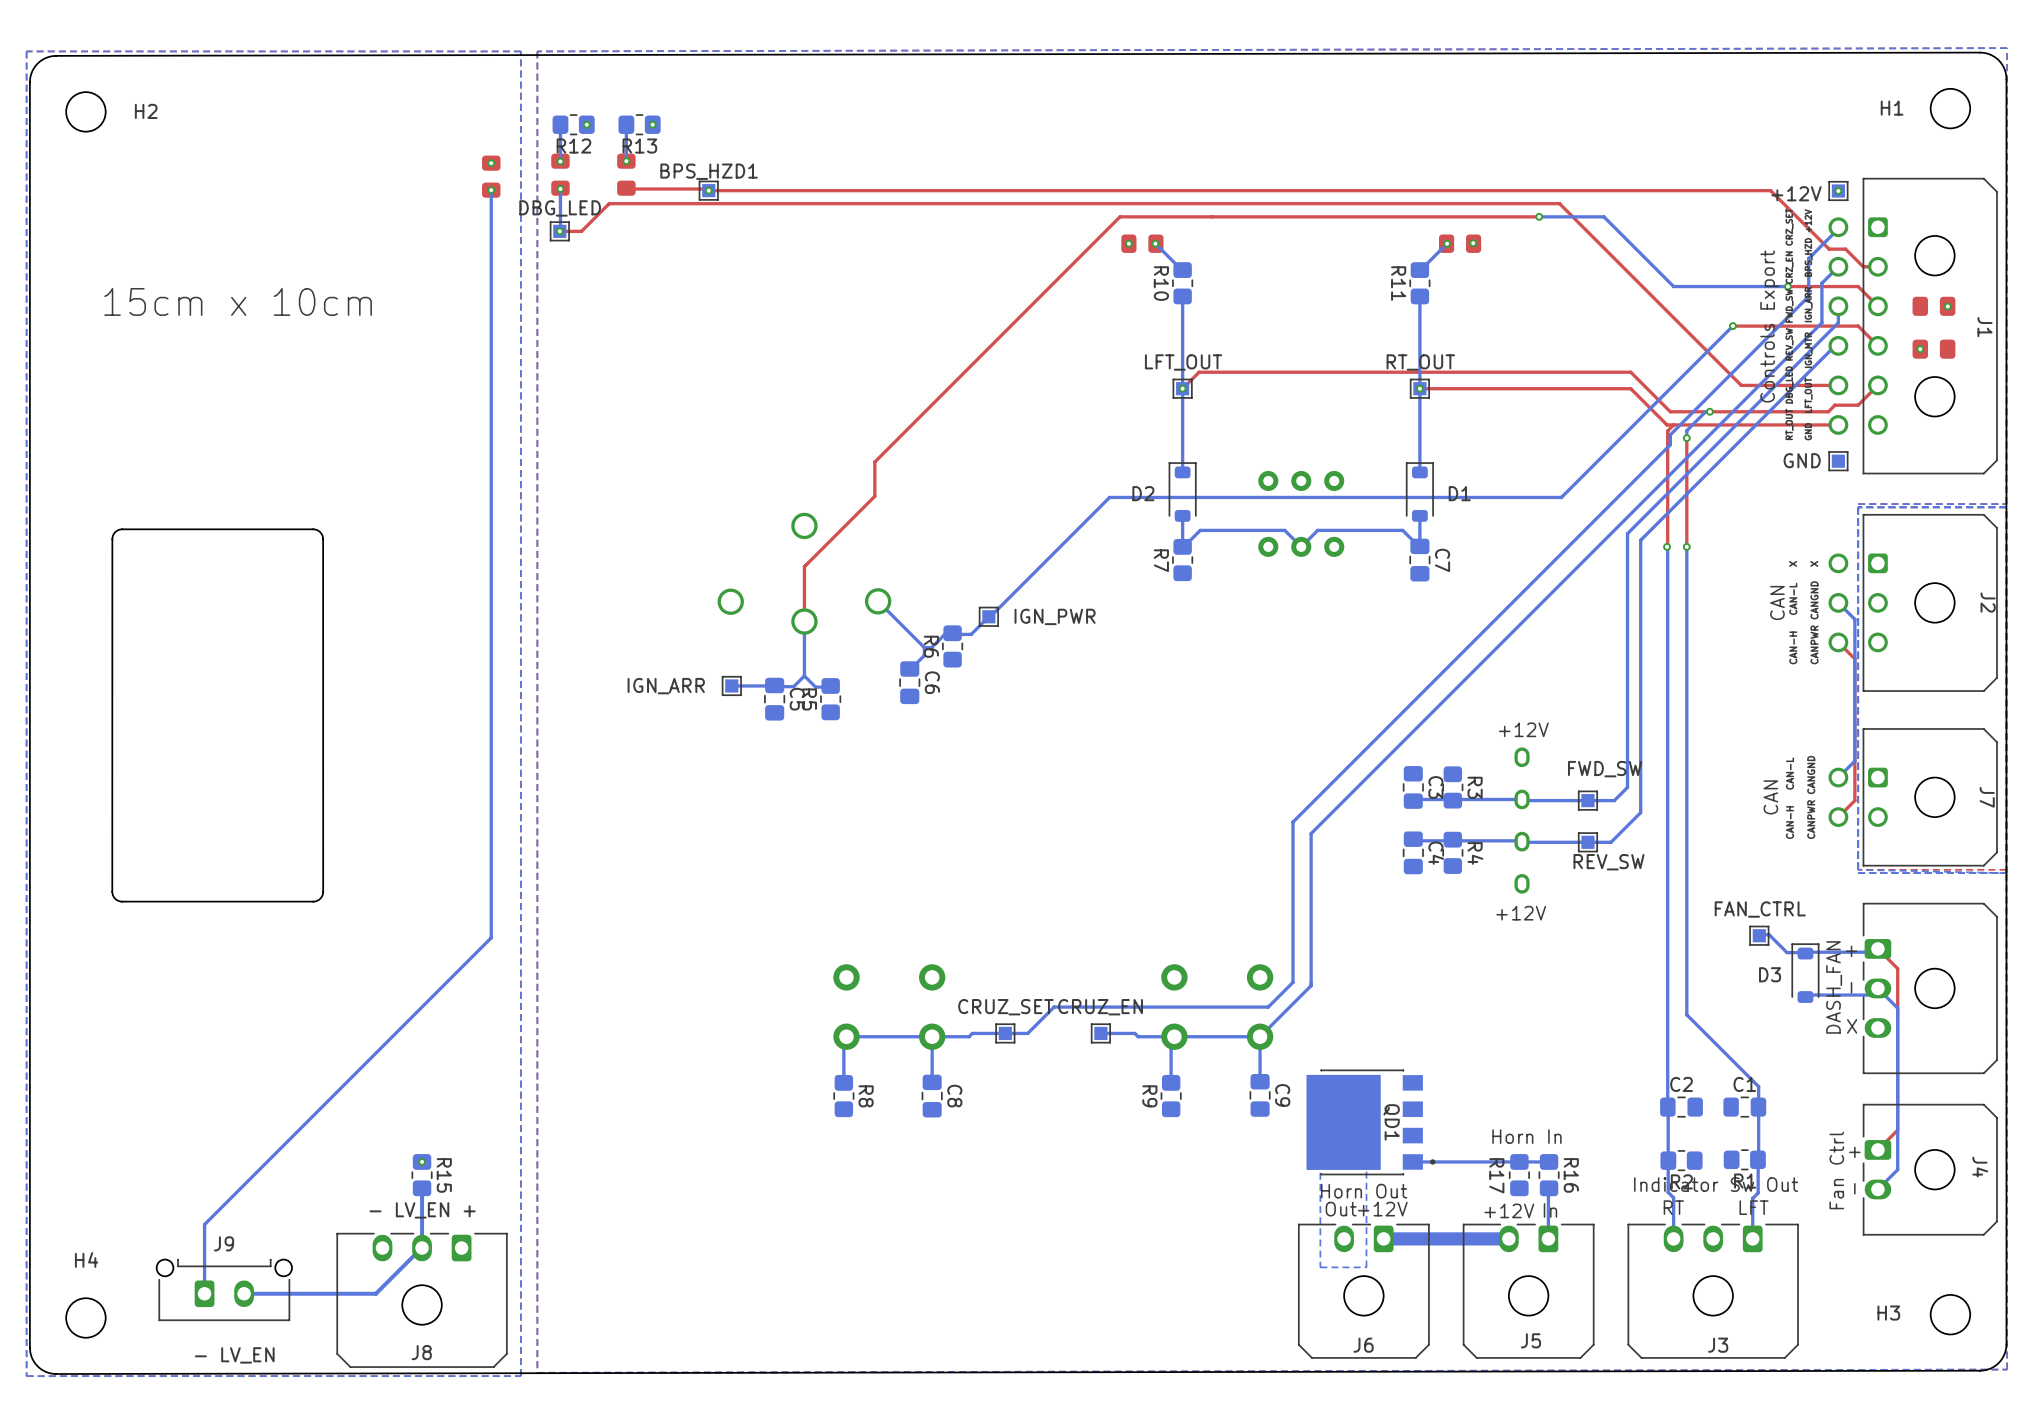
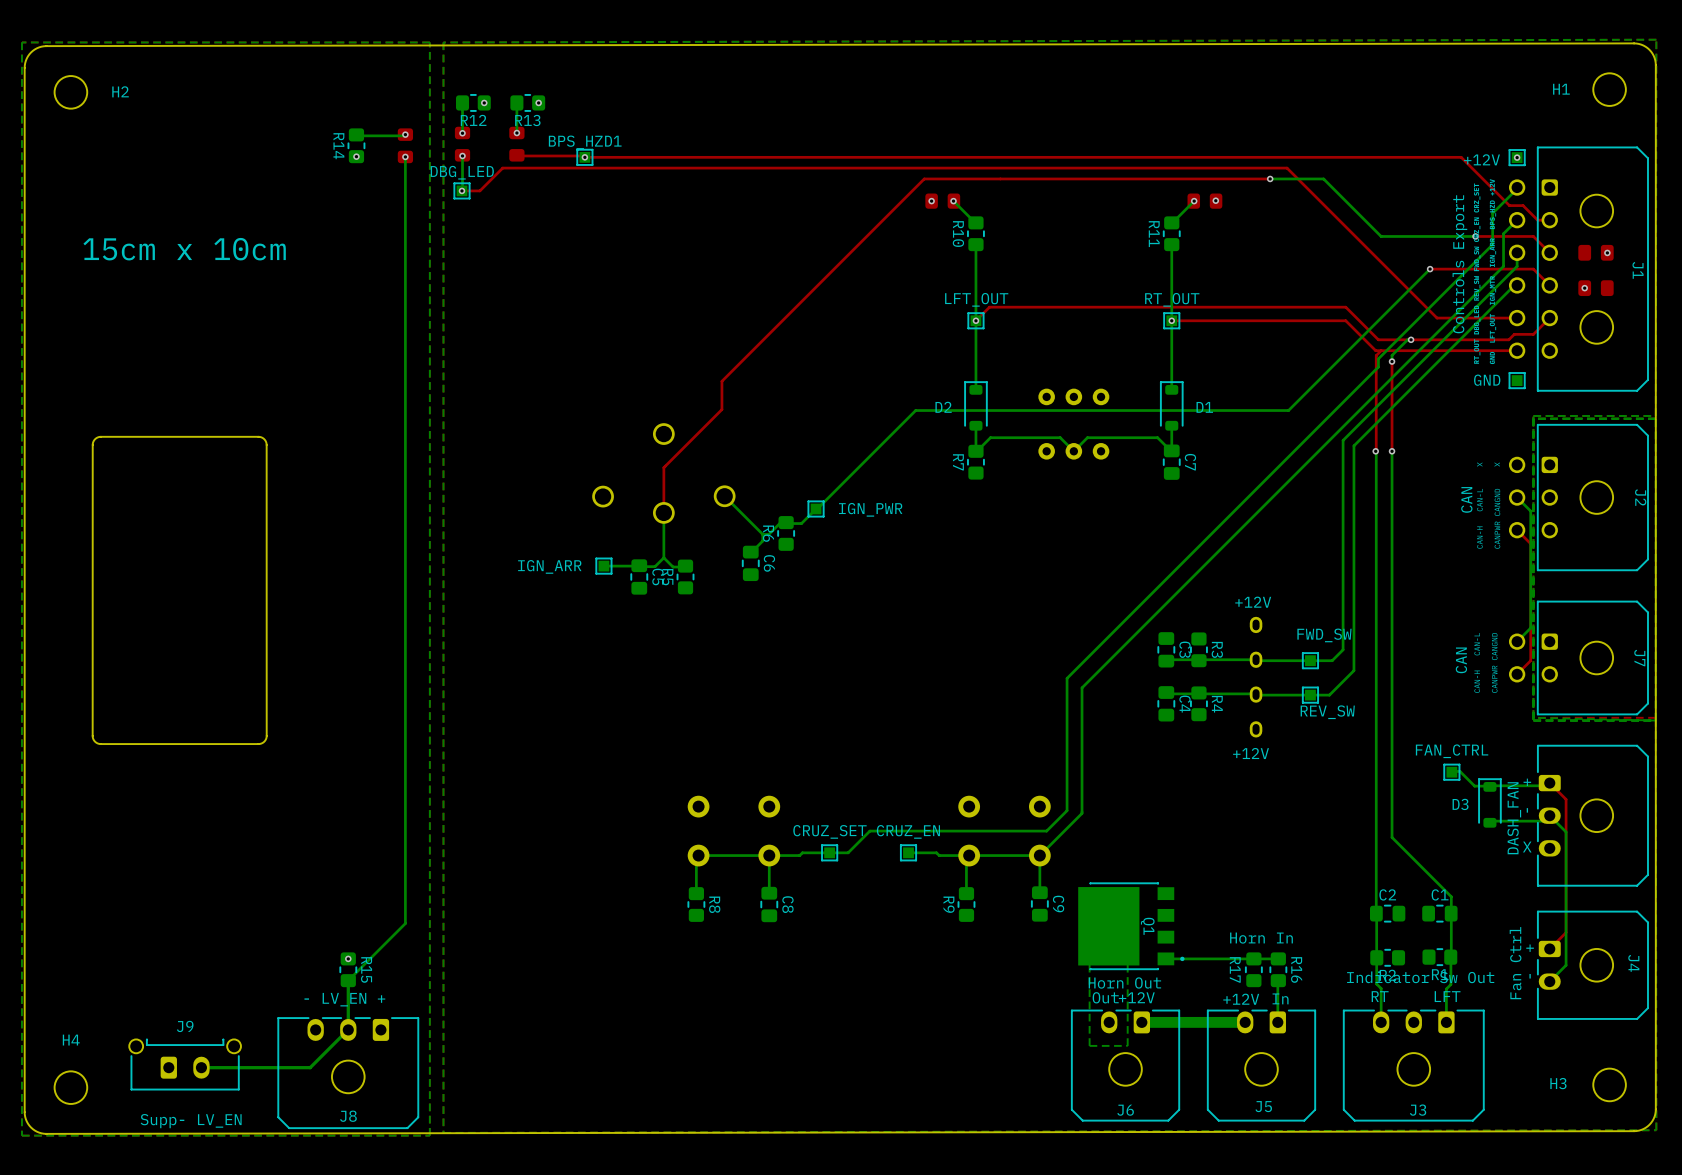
bottom track: none -> (404, 135) (356, 135)
R14: none -> (356, 145)
via: none -> (356, 156)
bottom track: (491, 937) (204, 1224) (204, 1293) -> (405, 773) (405, 923) (348, 980)
QD1 name: QD1 (1391, 1122) -> Q1 (1147, 926)
text: - LV_EN (234, 1355) -> Supp- LV_EN (191, 1121)

